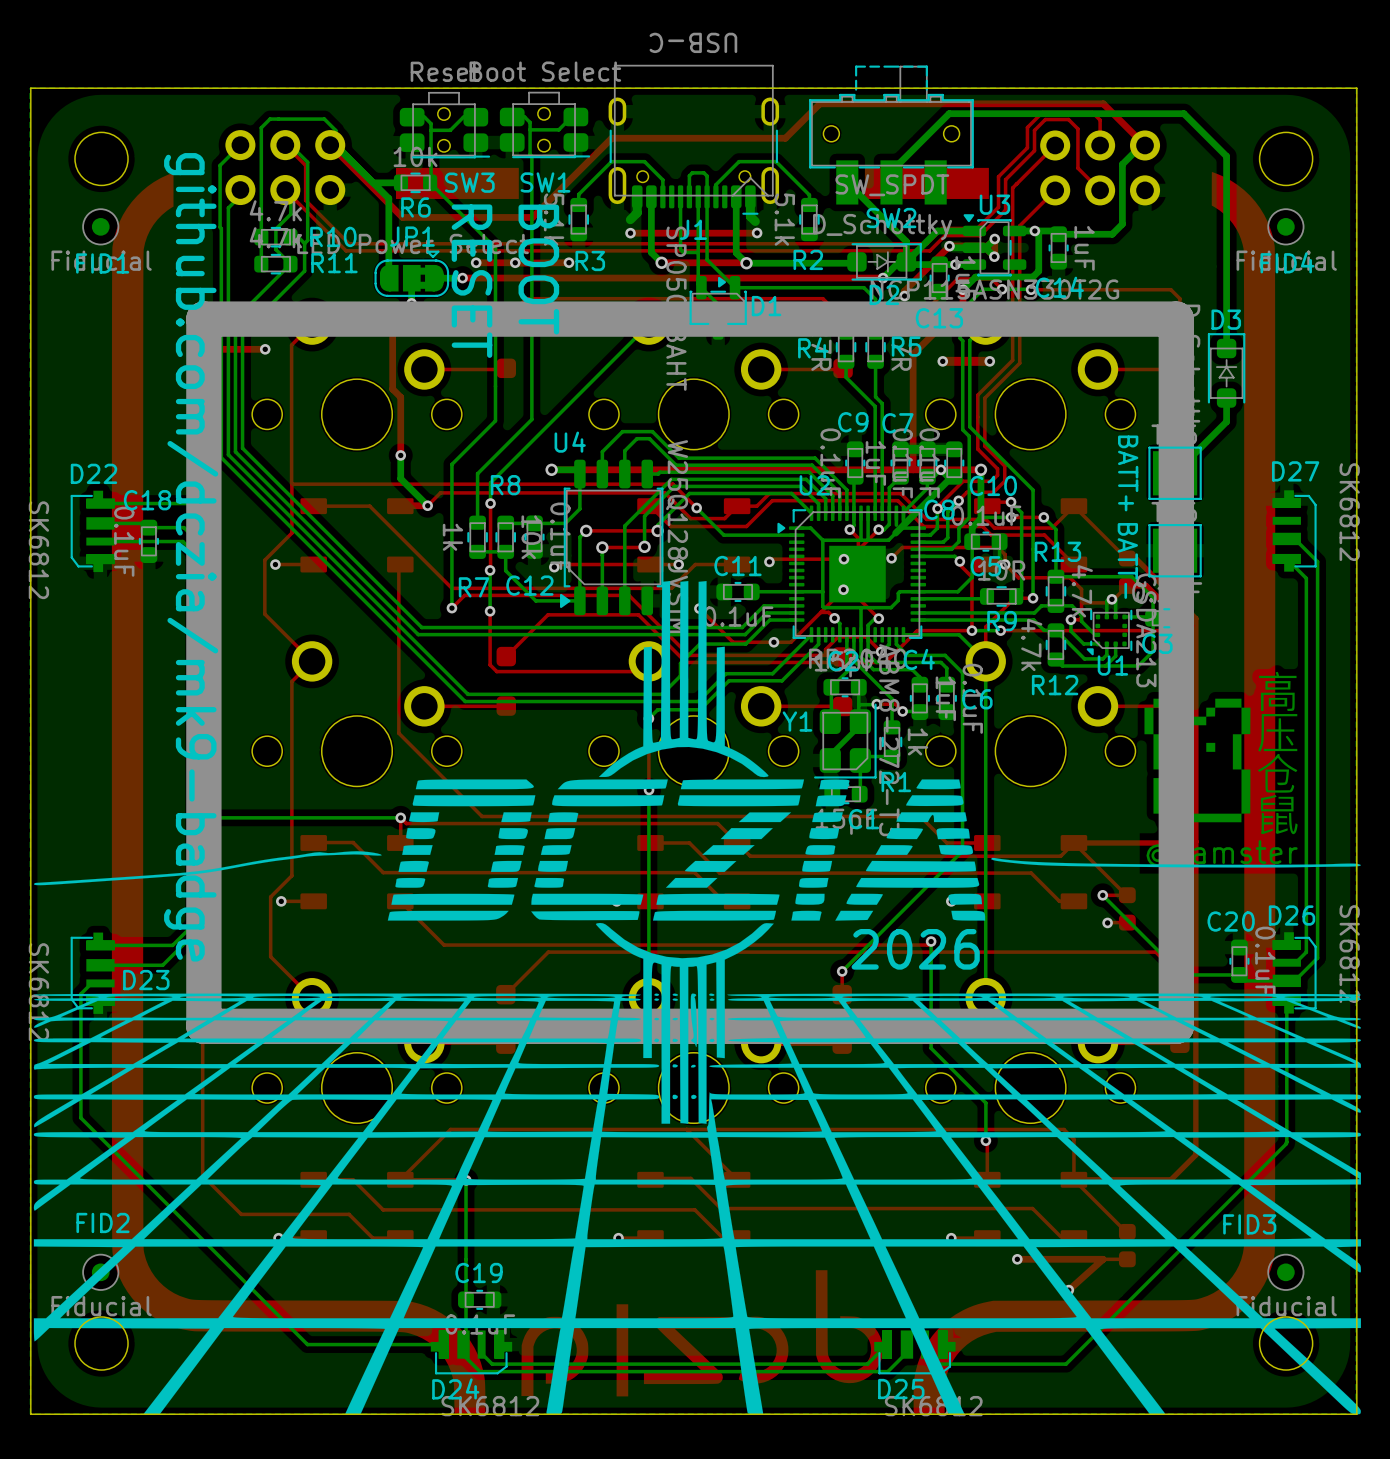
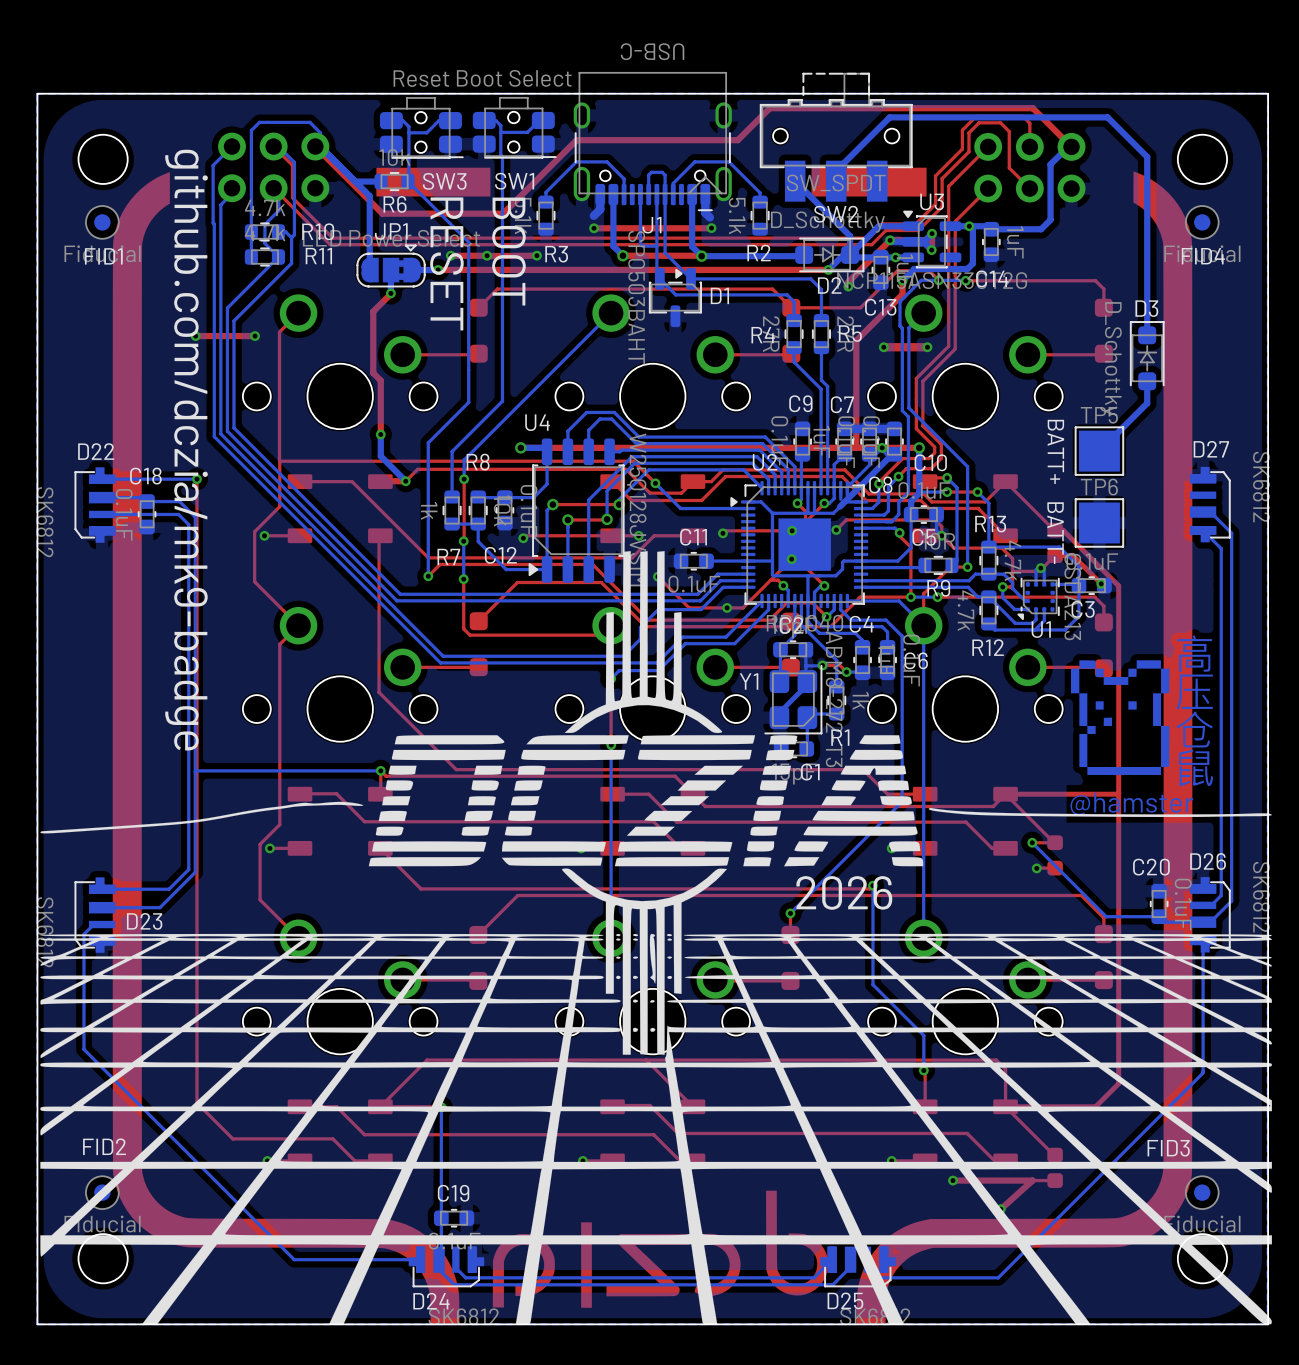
line: (1176, 319) (203, 319) (203, 1026) (1176, 1026) (1176, 319) -> none

